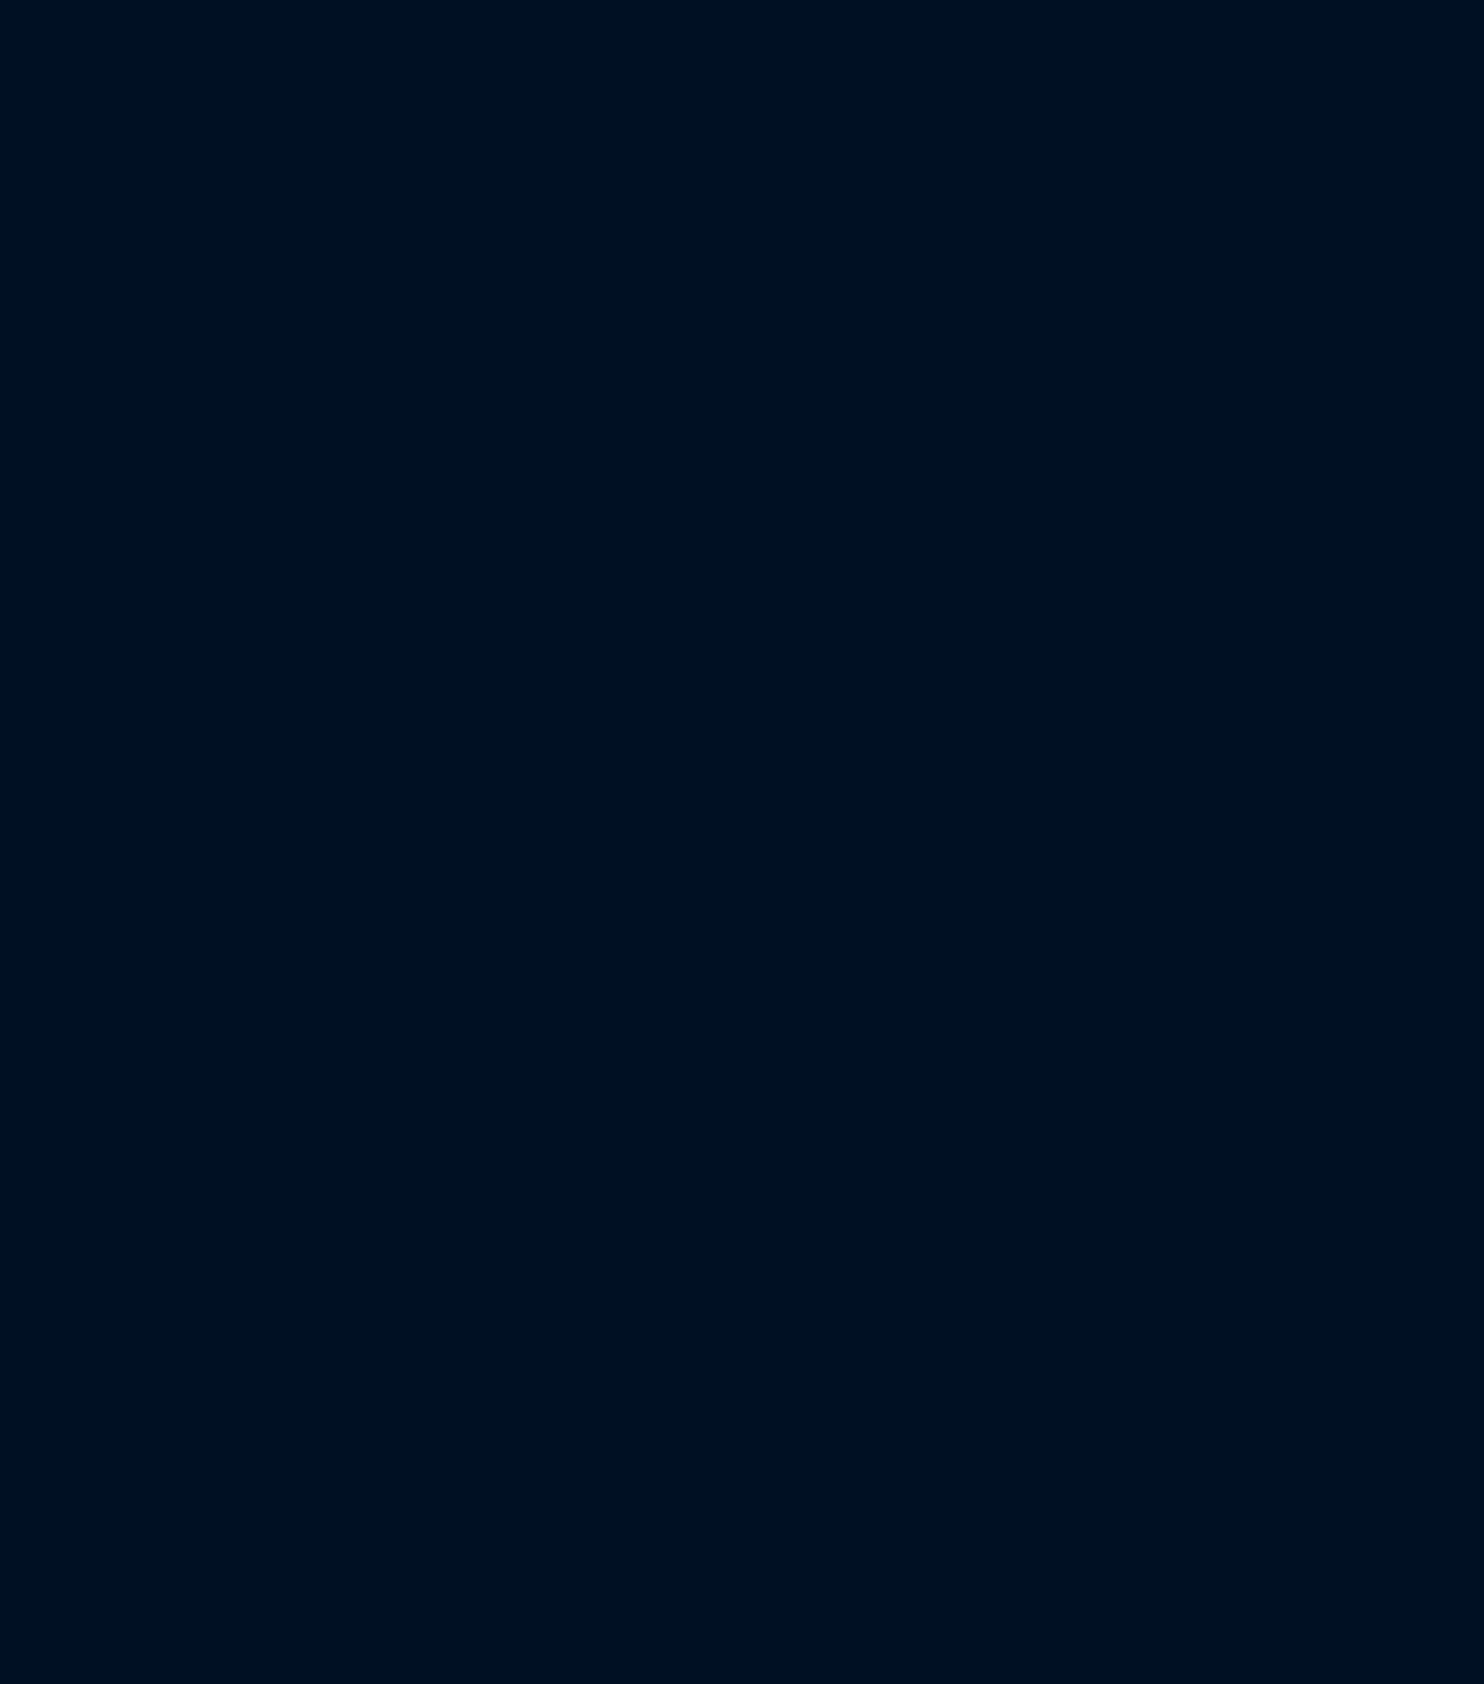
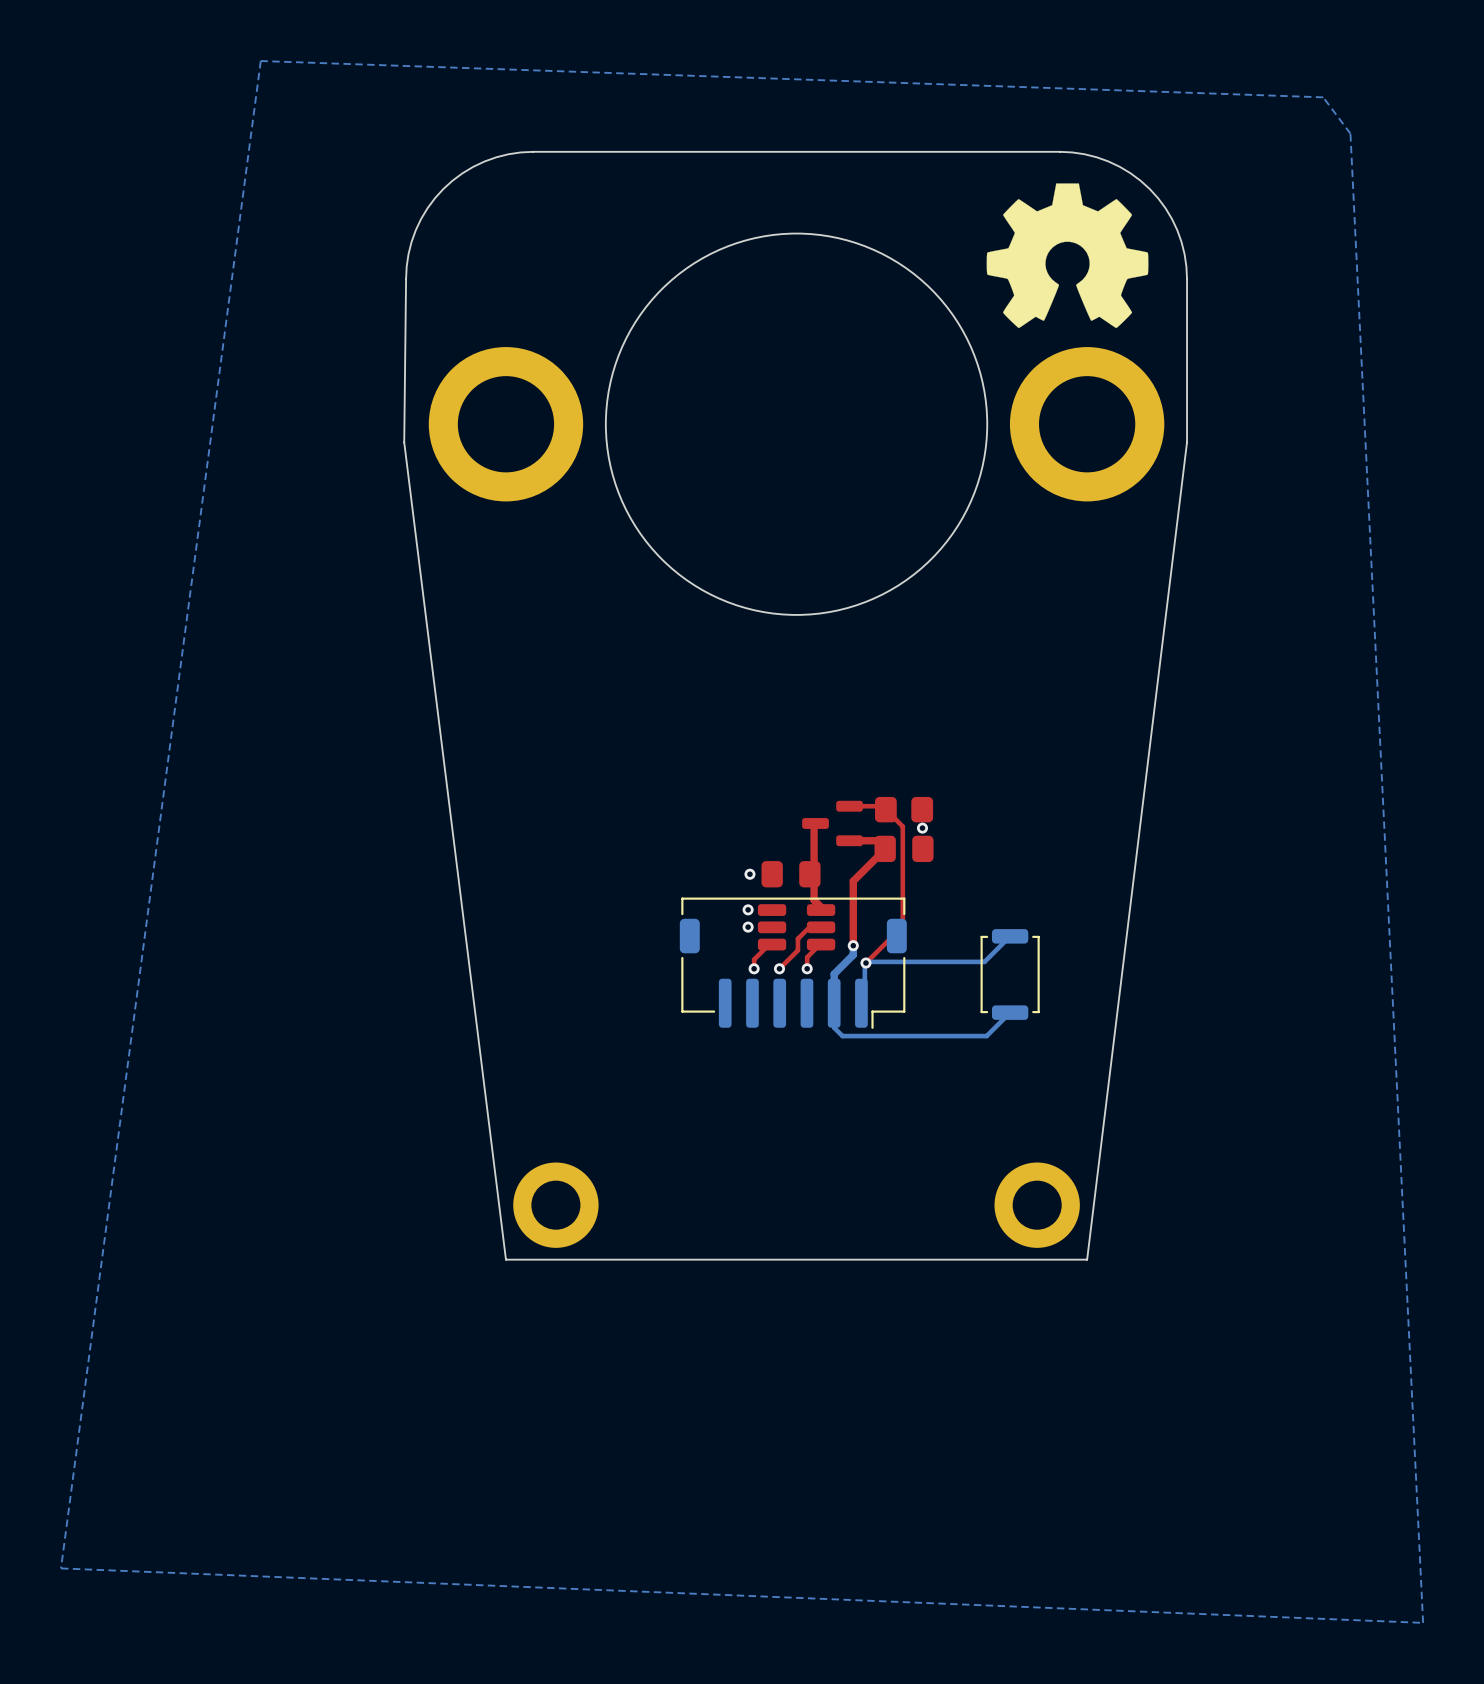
bottom zone outline: none -> (260, 61) (1323, 97) (1350, 133) (1423, 1622) (61, 1568) (260, 61)
board edge: none -> (1059, 151) (520, 152) (496, 157) (462, 173) (434, 198) (421, 219) (411, 242) (406, 266) (404, 442) (505, 1259) (1087, 1259) (1187, 442) (1187, 278) (1184, 254) (1177, 230) (1165, 208) (1149, 189) (1130, 173) (1108, 161) (1084, 154) (1059, 151)
drawing: none -> [986, 183, 1149, 329]
round board edge: none -> [605, 233, 988, 616]
part: none -> (505, 424)
part: none -> (1087, 424)
top track: none -> (849, 806) (882, 806) (902, 826) (902, 926) (865, 963)
part: none -> (904, 809)
top track: none -> (815, 823) (814, 900) (823, 909)
part: none -> (832, 823)
via: none -> (922, 828)
top track: none -> (849, 840) (877, 840) (885, 848) (853, 881) (853, 945)
part: none -> (904, 848)
via: none -> (749, 874)
part: none -> (791, 874)
via: none -> (748, 909)
via: none -> (748, 927)
part: none -> (796, 927)
top track: none -> (823, 927) (809, 927) (797, 938) (797, 950) (779, 968)
bottom track: none -> (1010, 936) (984, 961) (867, 961) (864, 964) (864, 999) (861, 1003)
top track: none -> (774, 944) (769, 944) (754, 959) (754, 968)
top track: none -> (823, 944) (820, 944) (807, 957) (807, 968)
bottom track: none -> (853, 945) (853, 954) (834, 974) (834, 1027) (842, 1036) (986, 1036) (1010, 1012)
via: none -> (853, 945)
part: none -> (793, 963)
via: none -> (865, 963)
via: none -> (754, 968)
via: none -> (779, 968)
via: none -> (807, 968)
part: none -> (1010, 974)
part: none -> (555, 1205)
part: none -> (1037, 1205)

